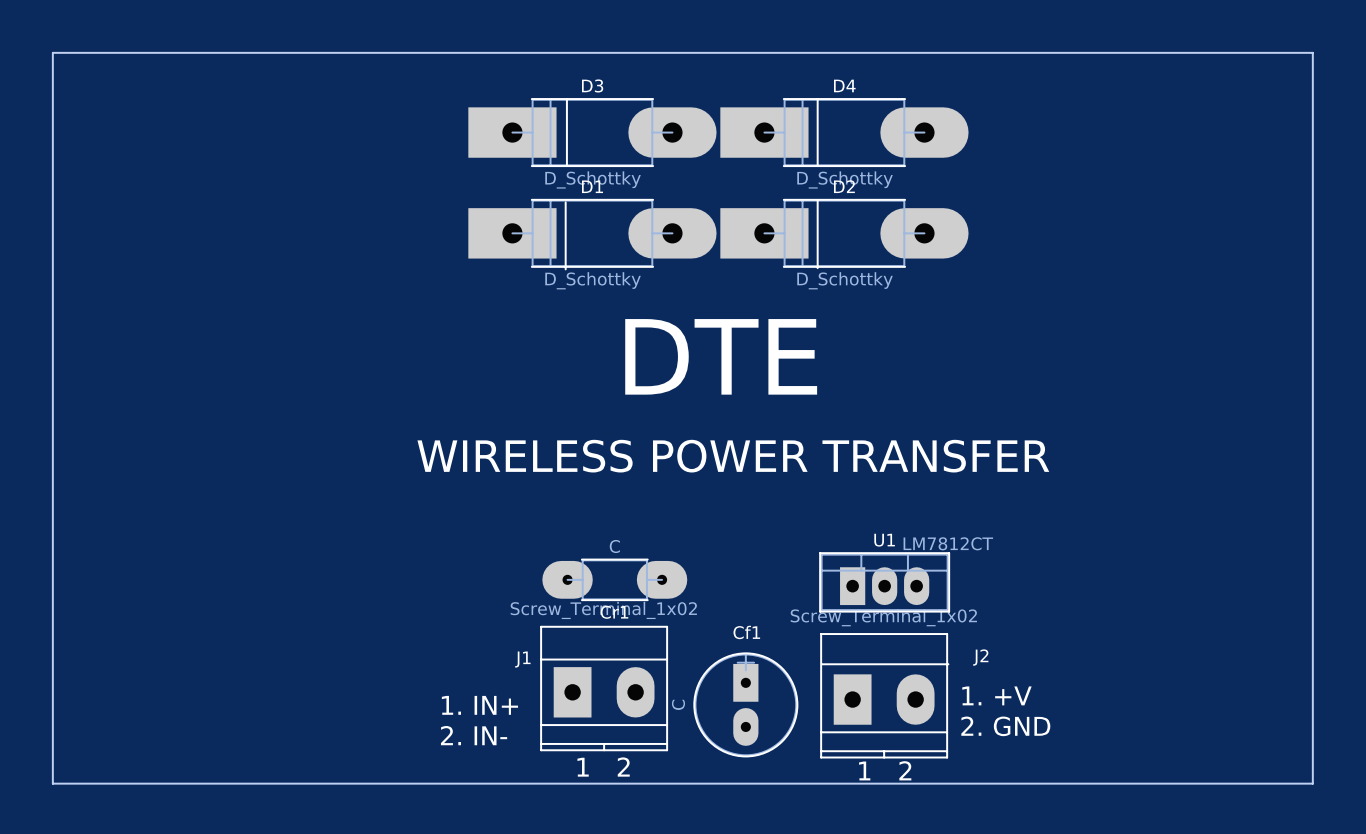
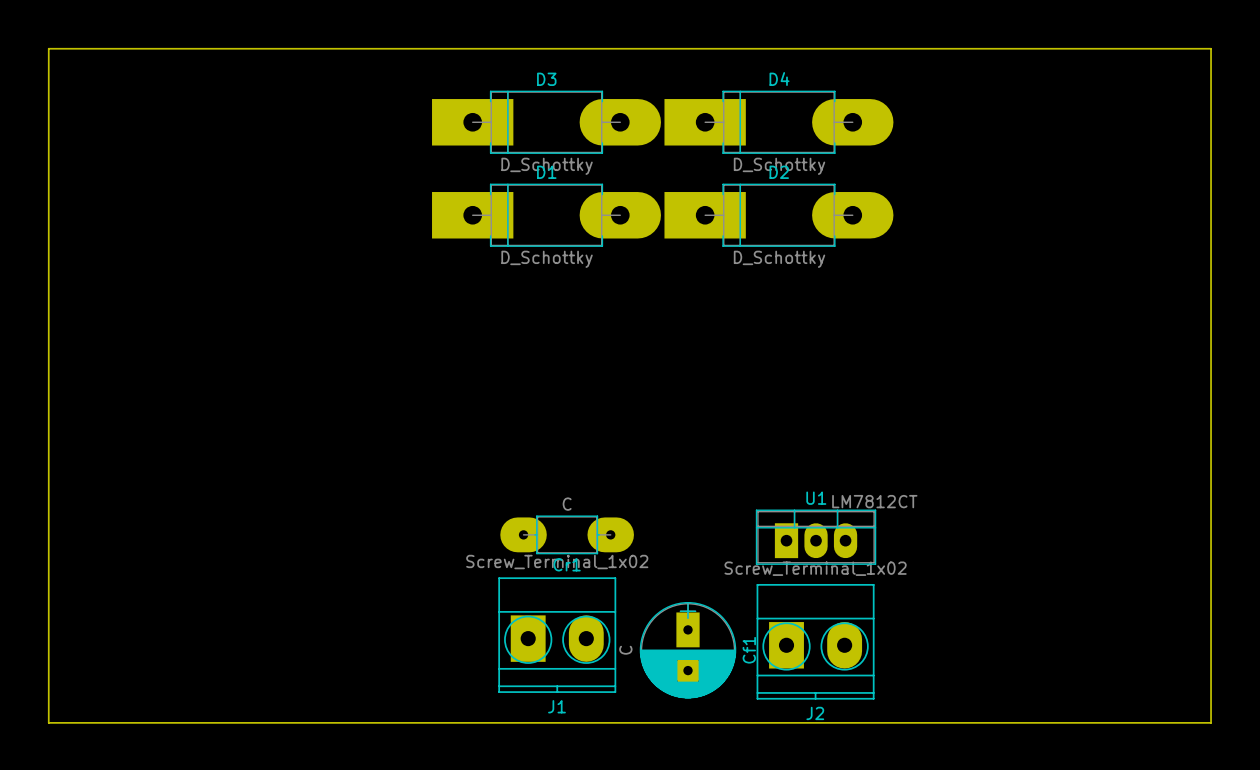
D3 footprint: [468, 98, 717, 167] -> [432, 90, 661, 154]
D4 footprint: [720, 98, 969, 167] -> [664, 90, 894, 154]
D1 footprint: [468, 199, 717, 271] -> [432, 183, 661, 247]
D2 footprint: [720, 199, 969, 269] -> [664, 183, 894, 247]
text: DTE (721, 356) -> none
text: WIRELESS POWER TRANSFER (733, 456) -> none
U1 footprint: [819, 552, 950, 613] -> [755, 509, 877, 565]
Cr1 footprint: [542, 558, 688, 601] -> [500, 515, 634, 555]
J1 footprint: [540, 625, 669, 752] -> [498, 577, 617, 693]
Cf1 name position: Cf1 (746, 632) -> Cf1 (749, 650)
J2 footprint: [820, 633, 950, 759] -> [756, 583, 875, 700]
Cf1 footprint: [693, 652, 799, 758] -> [639, 602, 737, 699]
J2 name position: J2 (980, 657) -> J2 (815, 713)
J1 name position: J1 (522, 659) -> J1 (556, 706)
text: 1. +V (996, 695) -> none
text: 1. IN+ (479, 705) -> none
text: 2. GND (1005, 726) -> none
text: 2. IN- (474, 735) -> none
text: 1 2 (603, 767) -> none
text: 1 2 (885, 770) -> none

